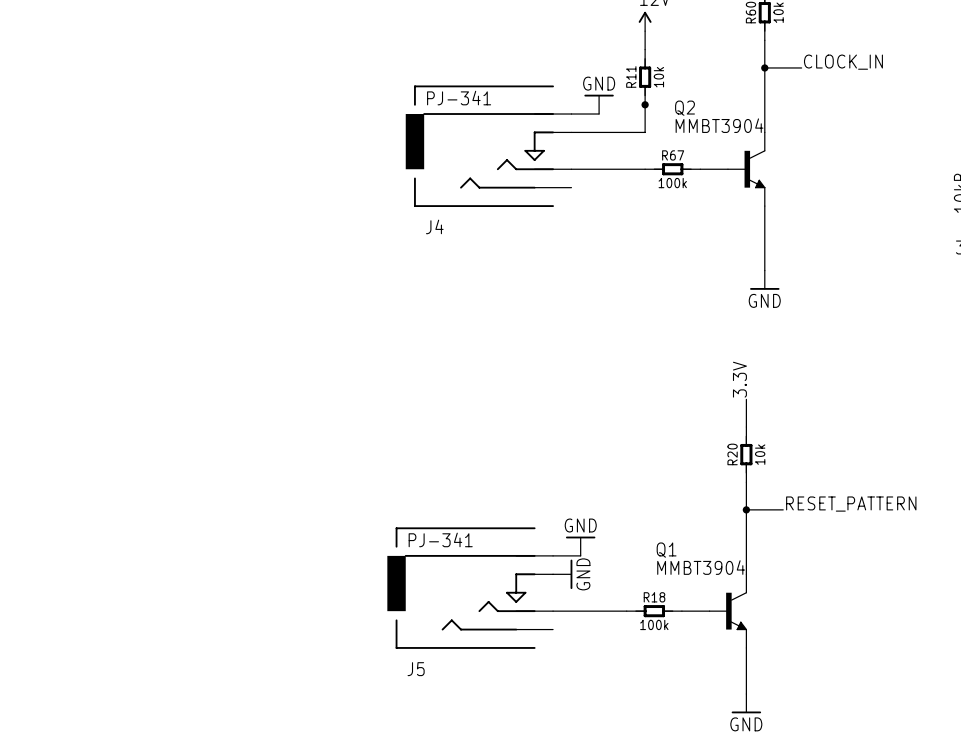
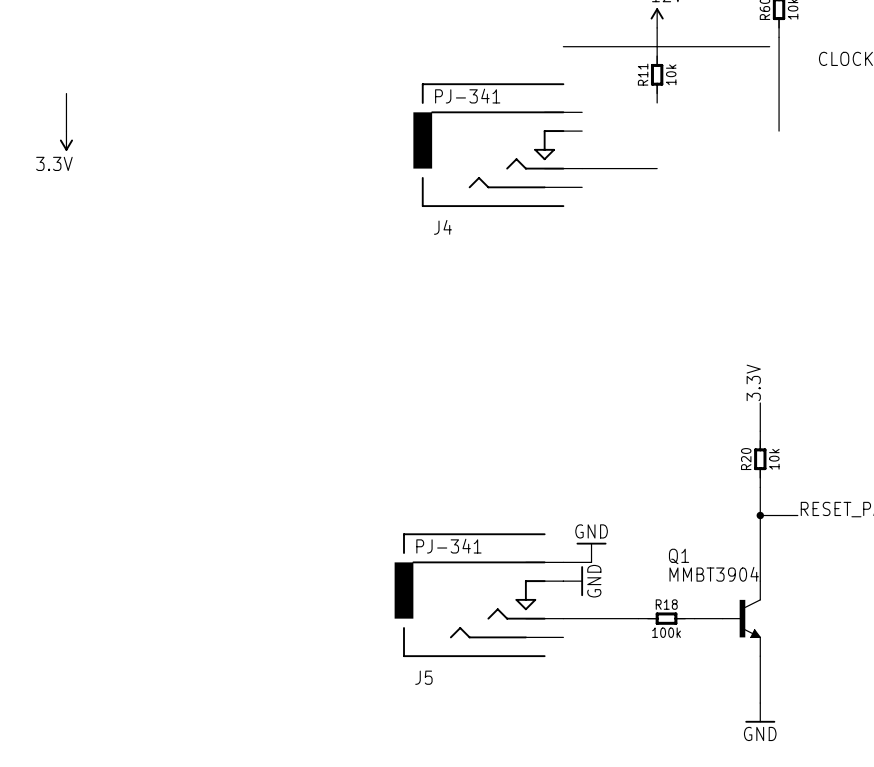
wire: none -> (563, 46) (769, 46)
wire: (764, 67) (801, 67) -> none
junction: (764, 67) -> none
wire: none -> (66, 93) (66, 131)
power symbol: GND (599, 104) -> none
wire: (645, 104) (645, 132) (571, 132) -> none
junction: (645, 104) -> none
wire: (571, 114) (599, 114) -> none
power symbol: none -> 3.3V (66, 140)
R67: 100k (672, 169) -> none
wire: (700, 169) (727, 169) -> none
Q2: MMBT3904 (746, 169) -> none
wire: (764, 206) (764, 270) -> none
power symbol: GND (764, 280) -> none

